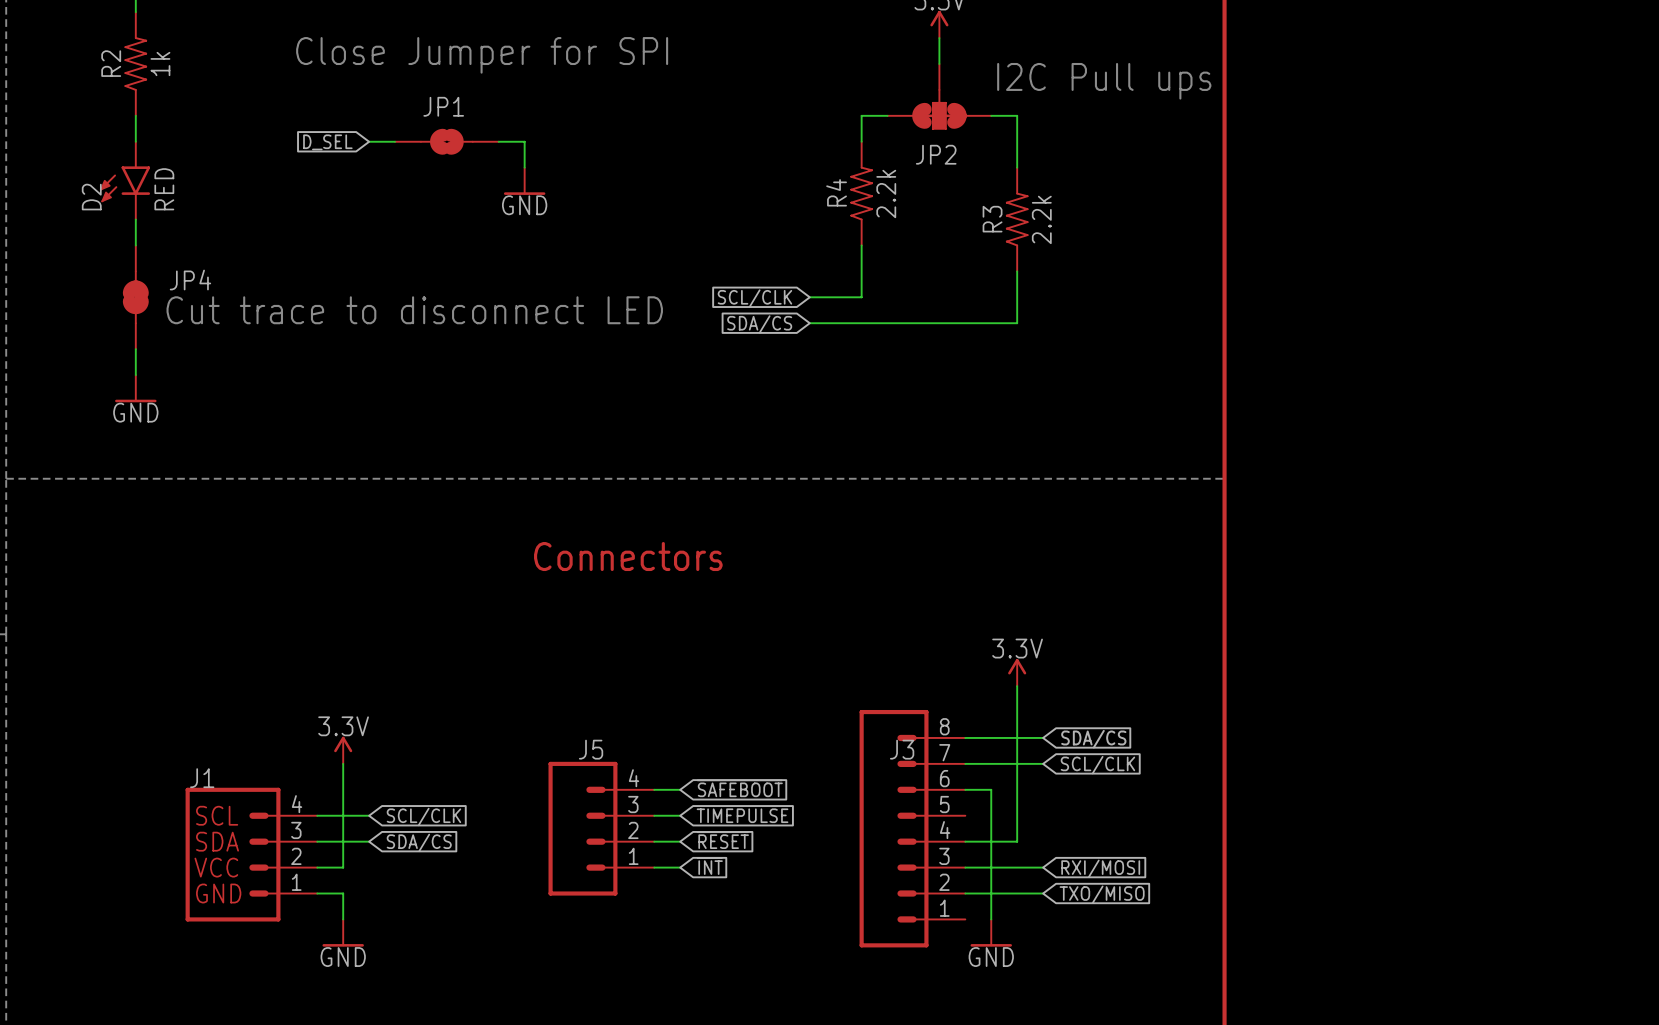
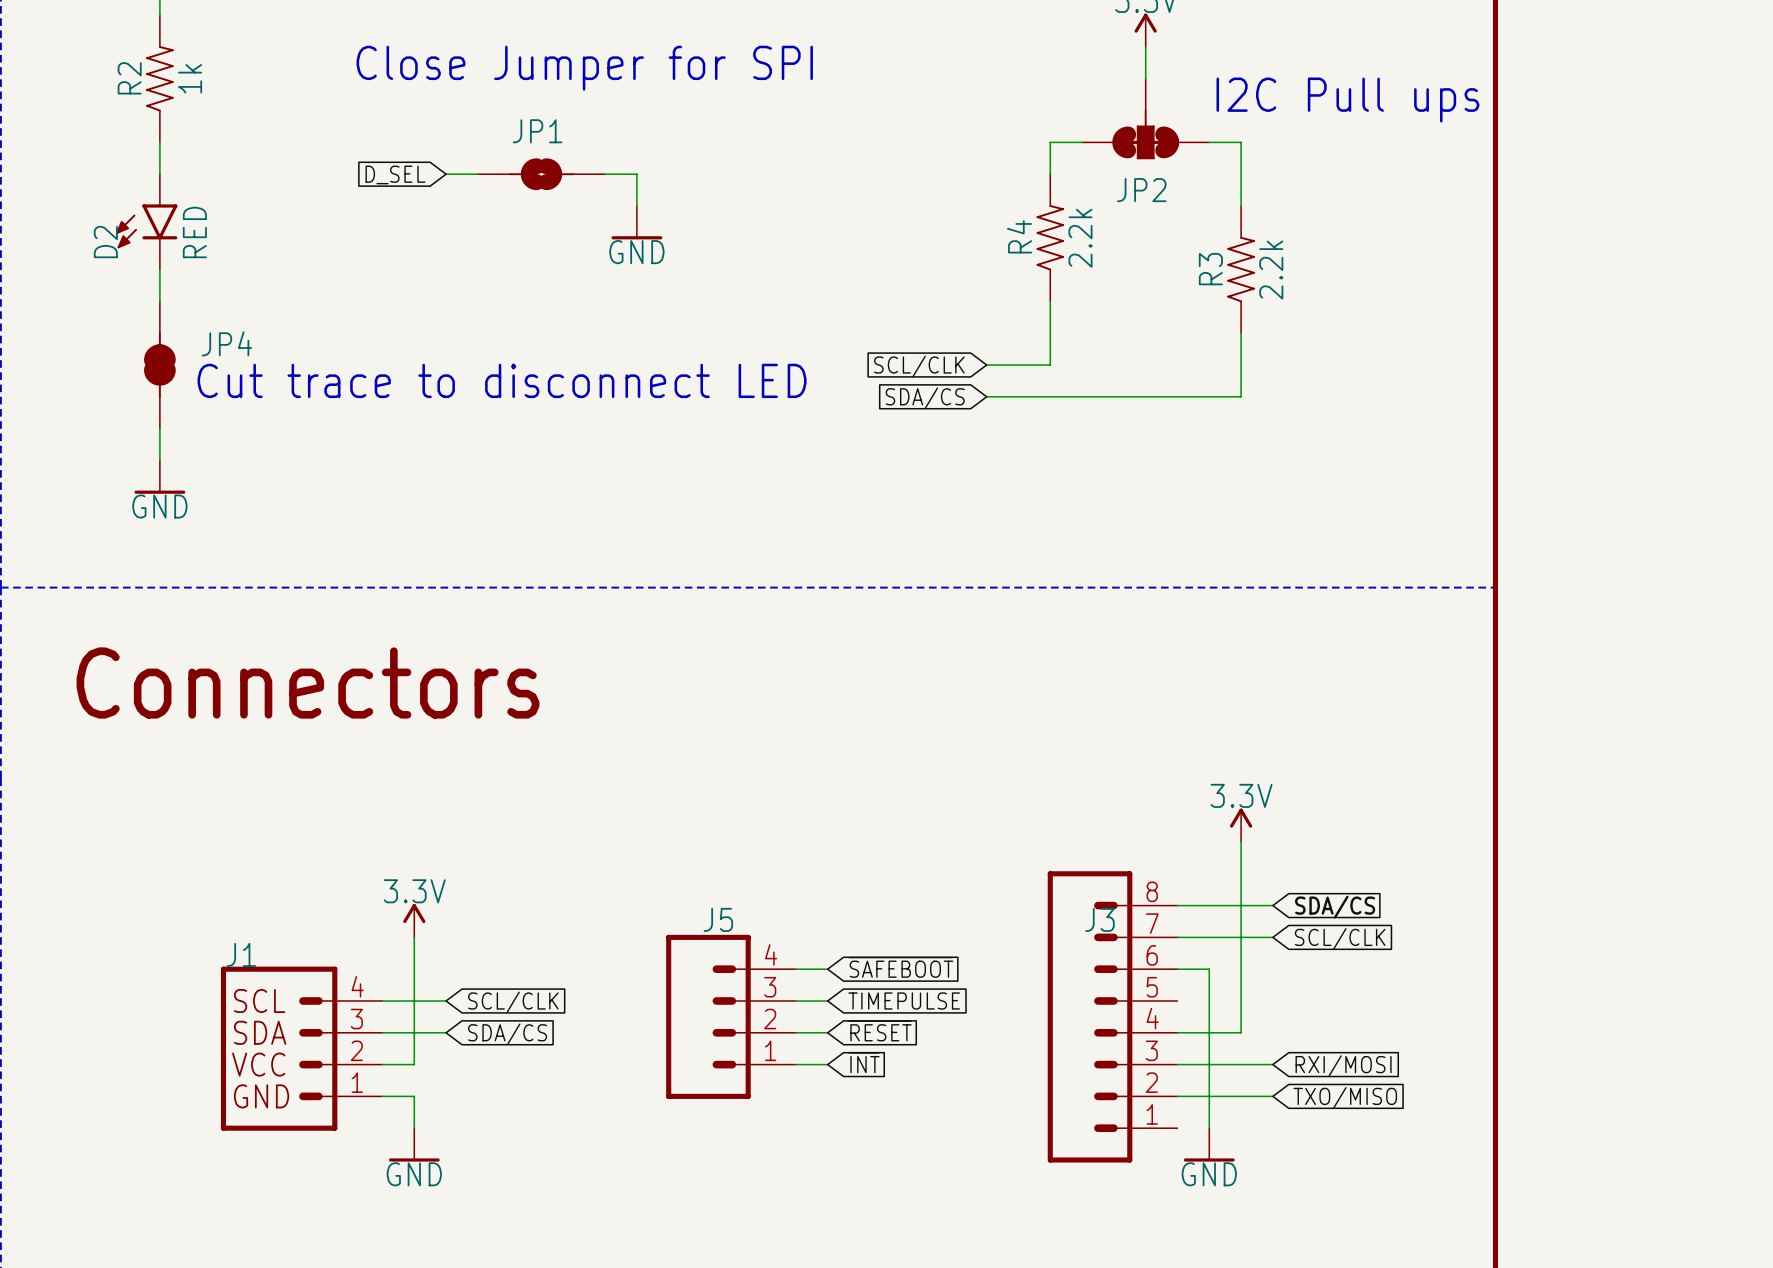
text: none -> Connectors (308, 682)
text: Connectors (628, 556) -> none

